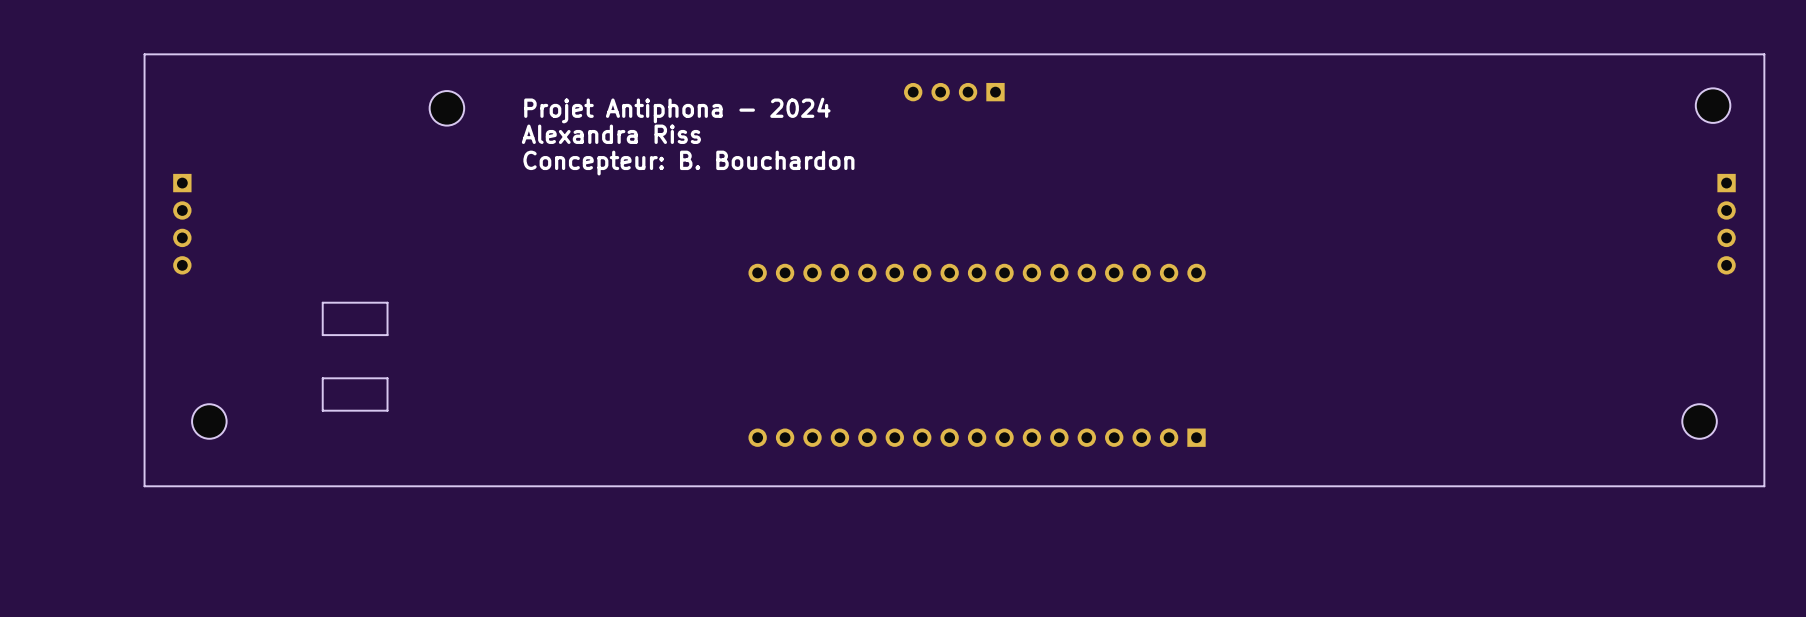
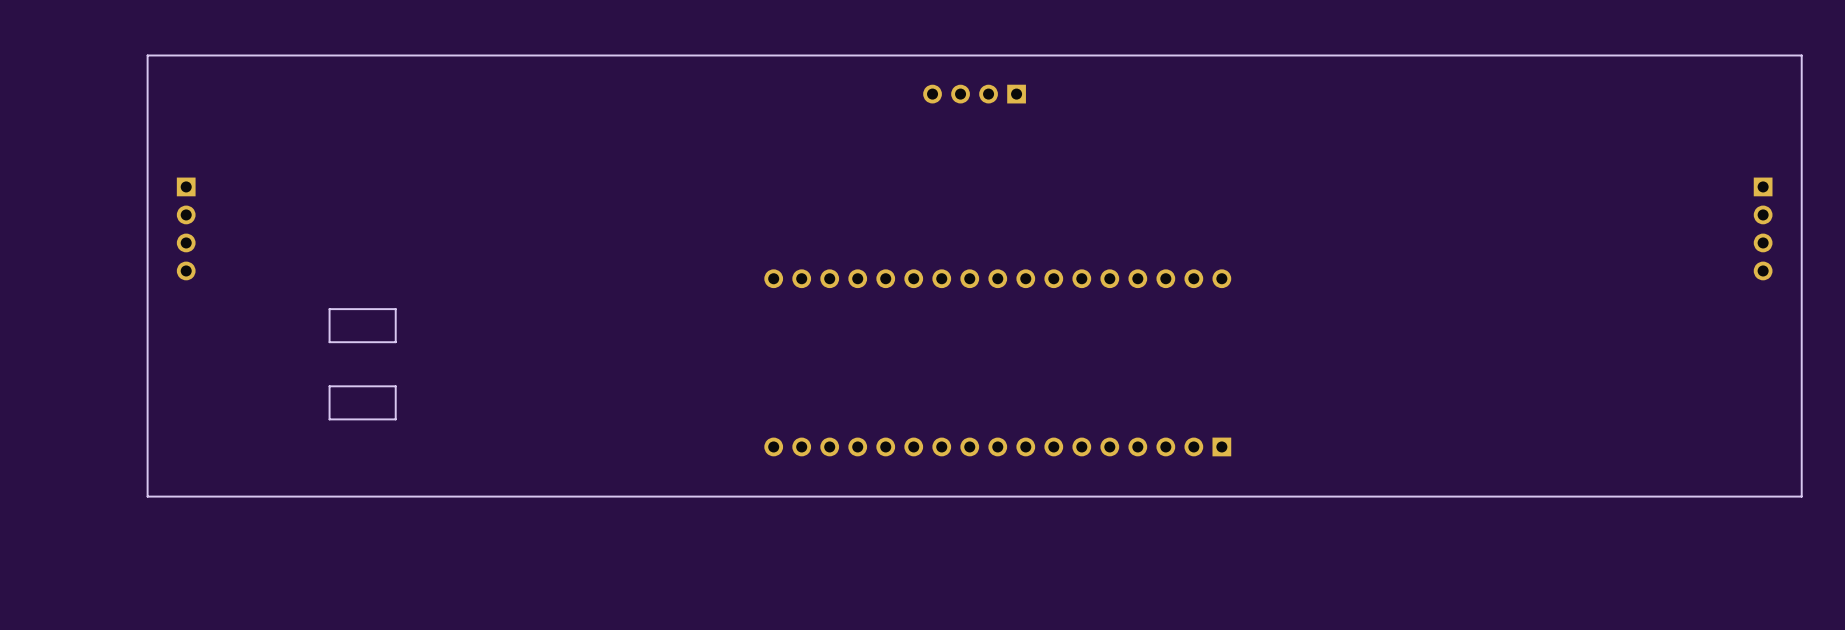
part: (1713, 105) -> none
part: (446, 108) -> none
text: Projet Antiphona - 2024 (677, 110) -> none
text: Alexandra Riss (611, 134) -> none
text: Concepteur: B. Bouchardon (688, 163) -> none
part: (209, 421) -> none
part: (1699, 421) -> none

